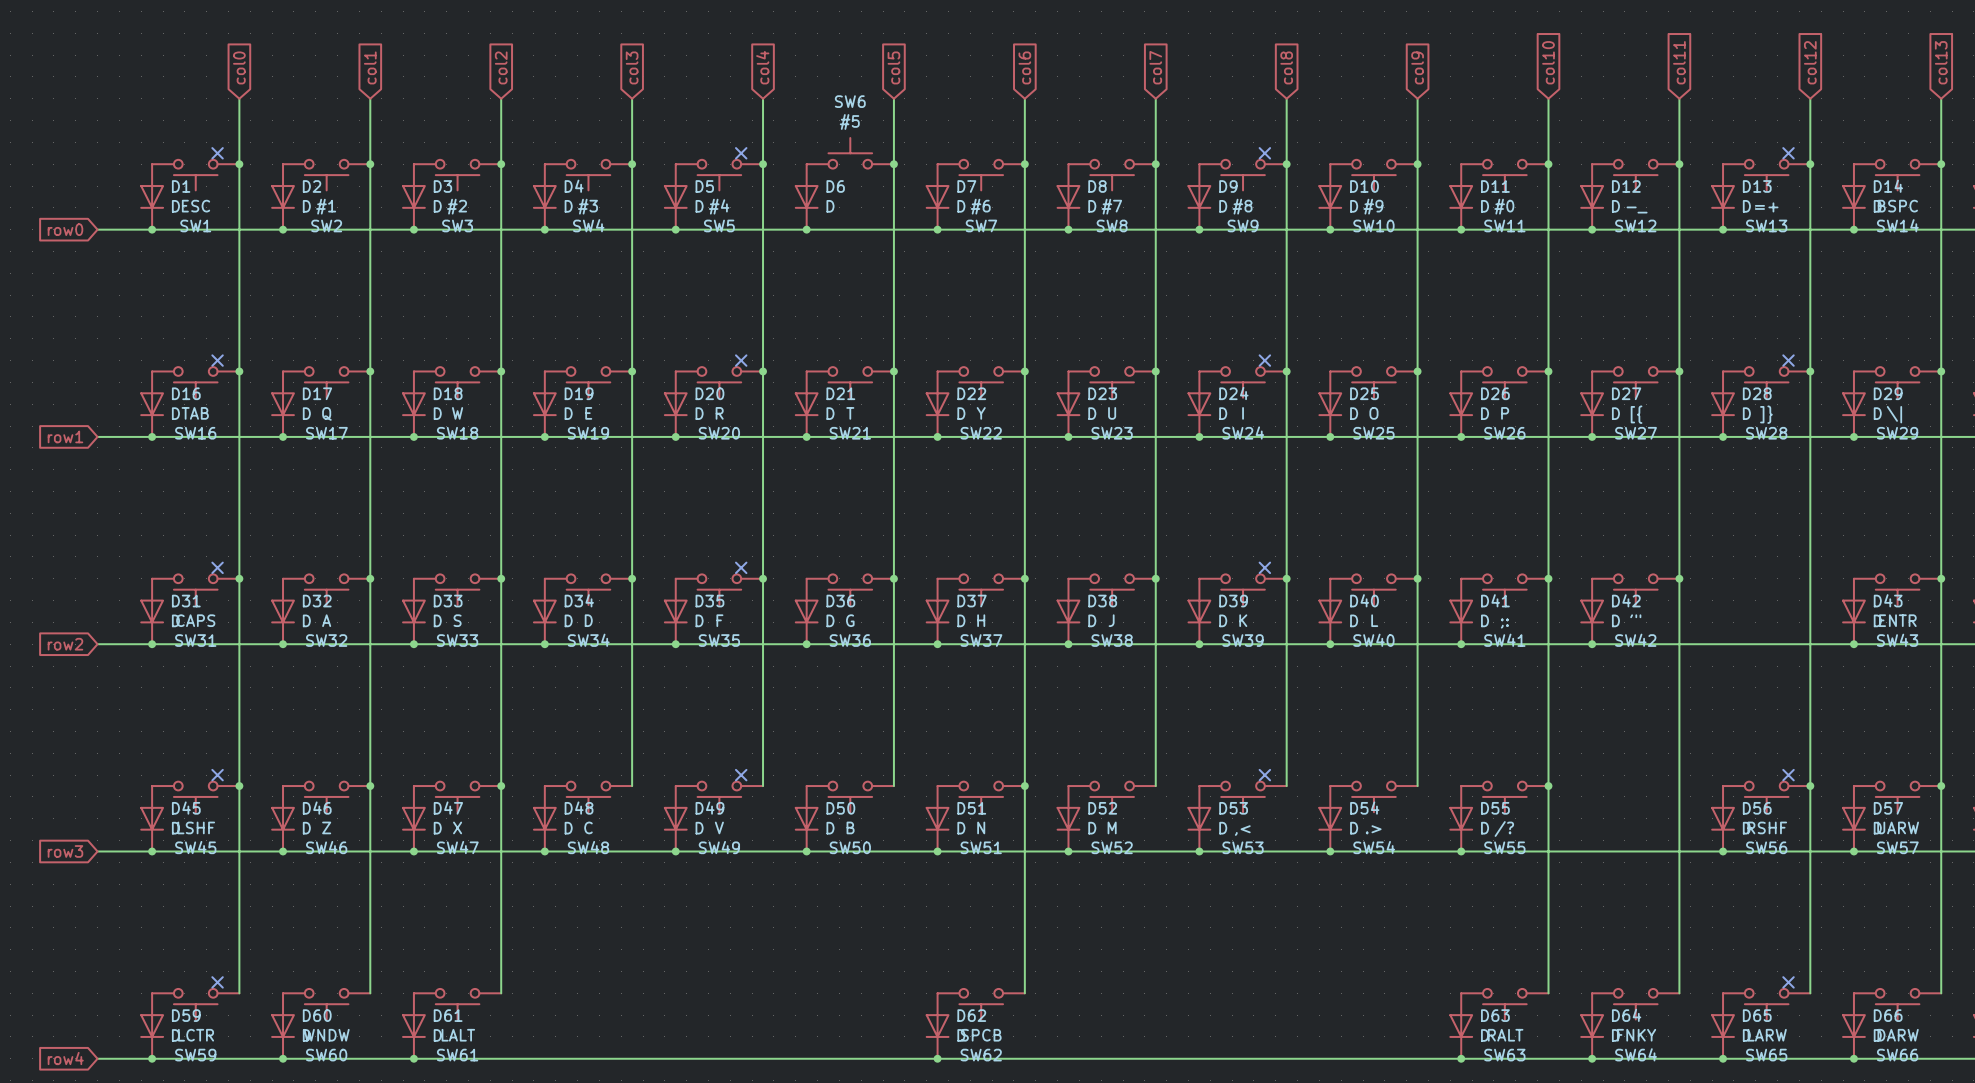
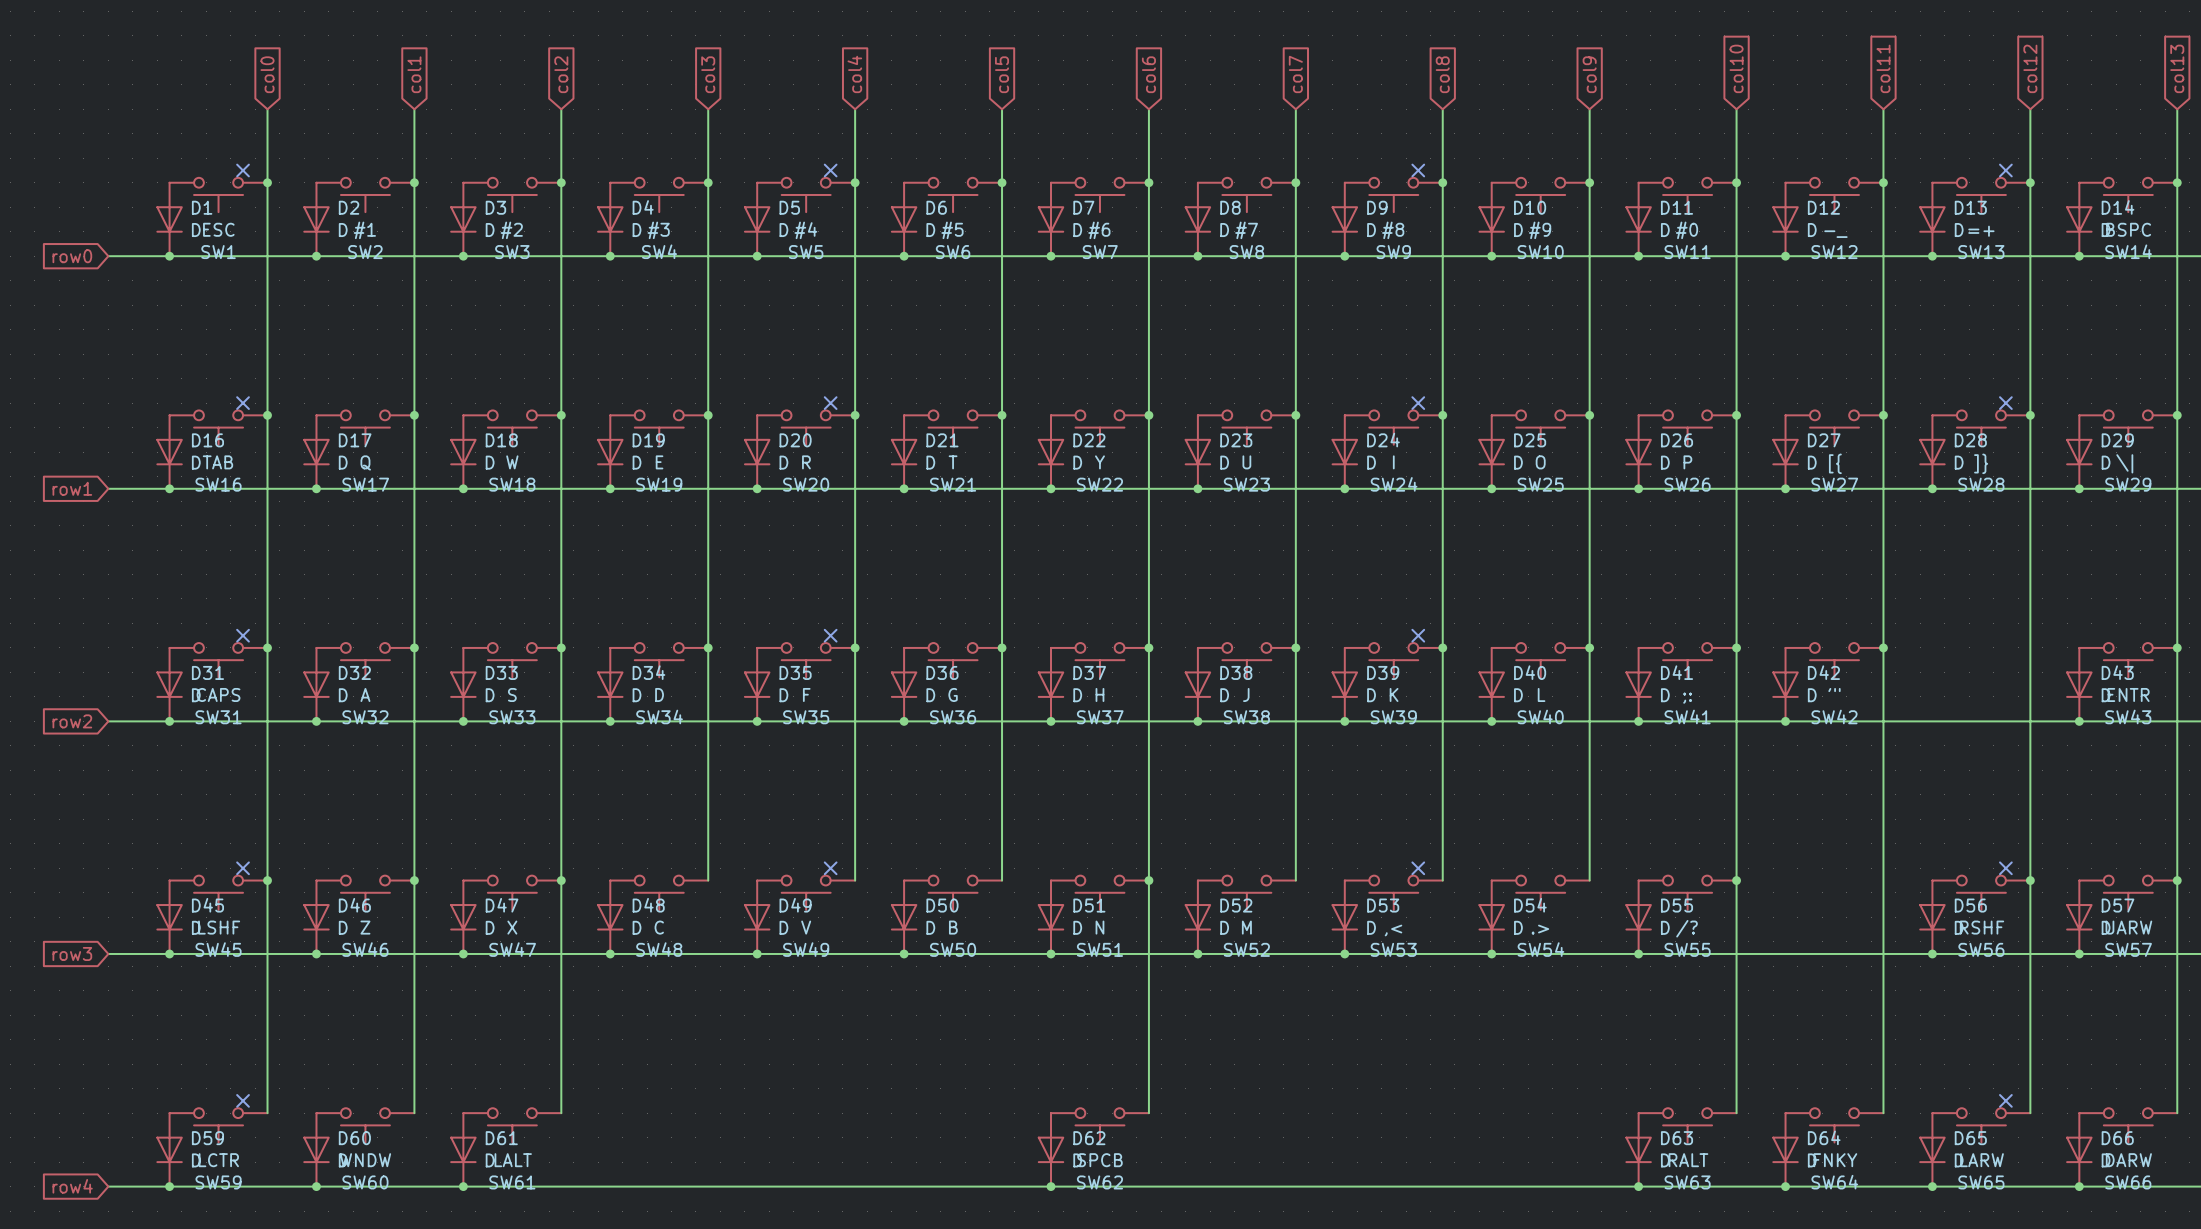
SW6 rotation: 0° (850, 153) -> 180° (953, 194)

